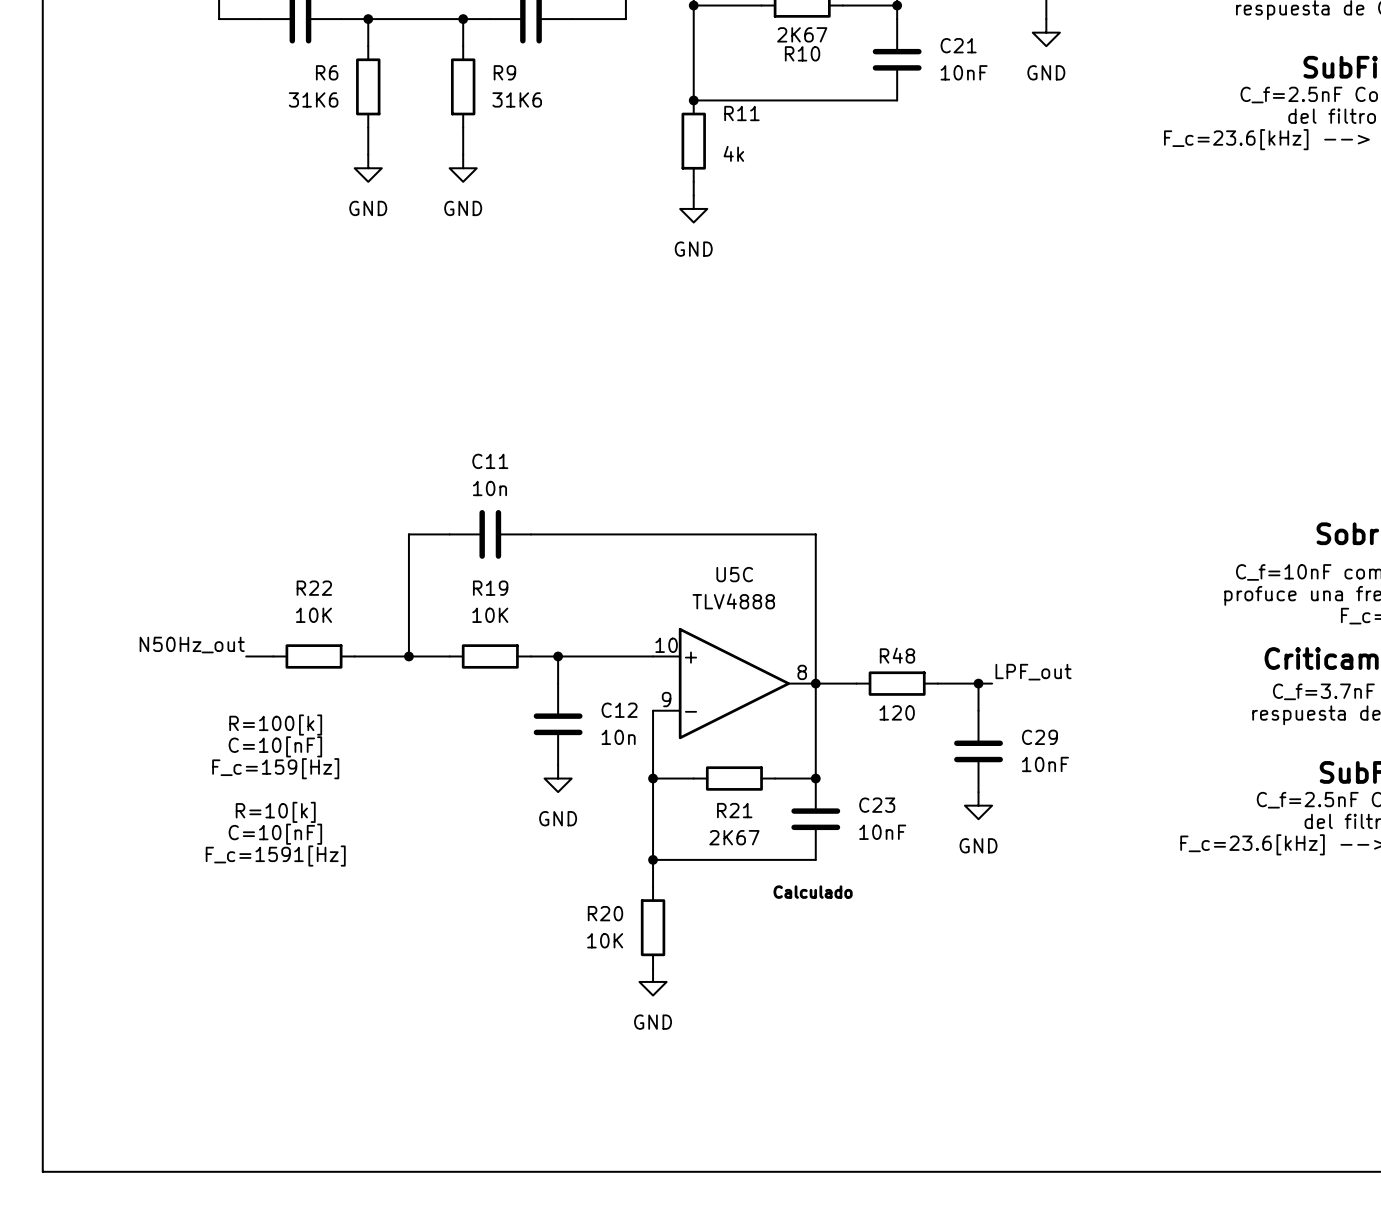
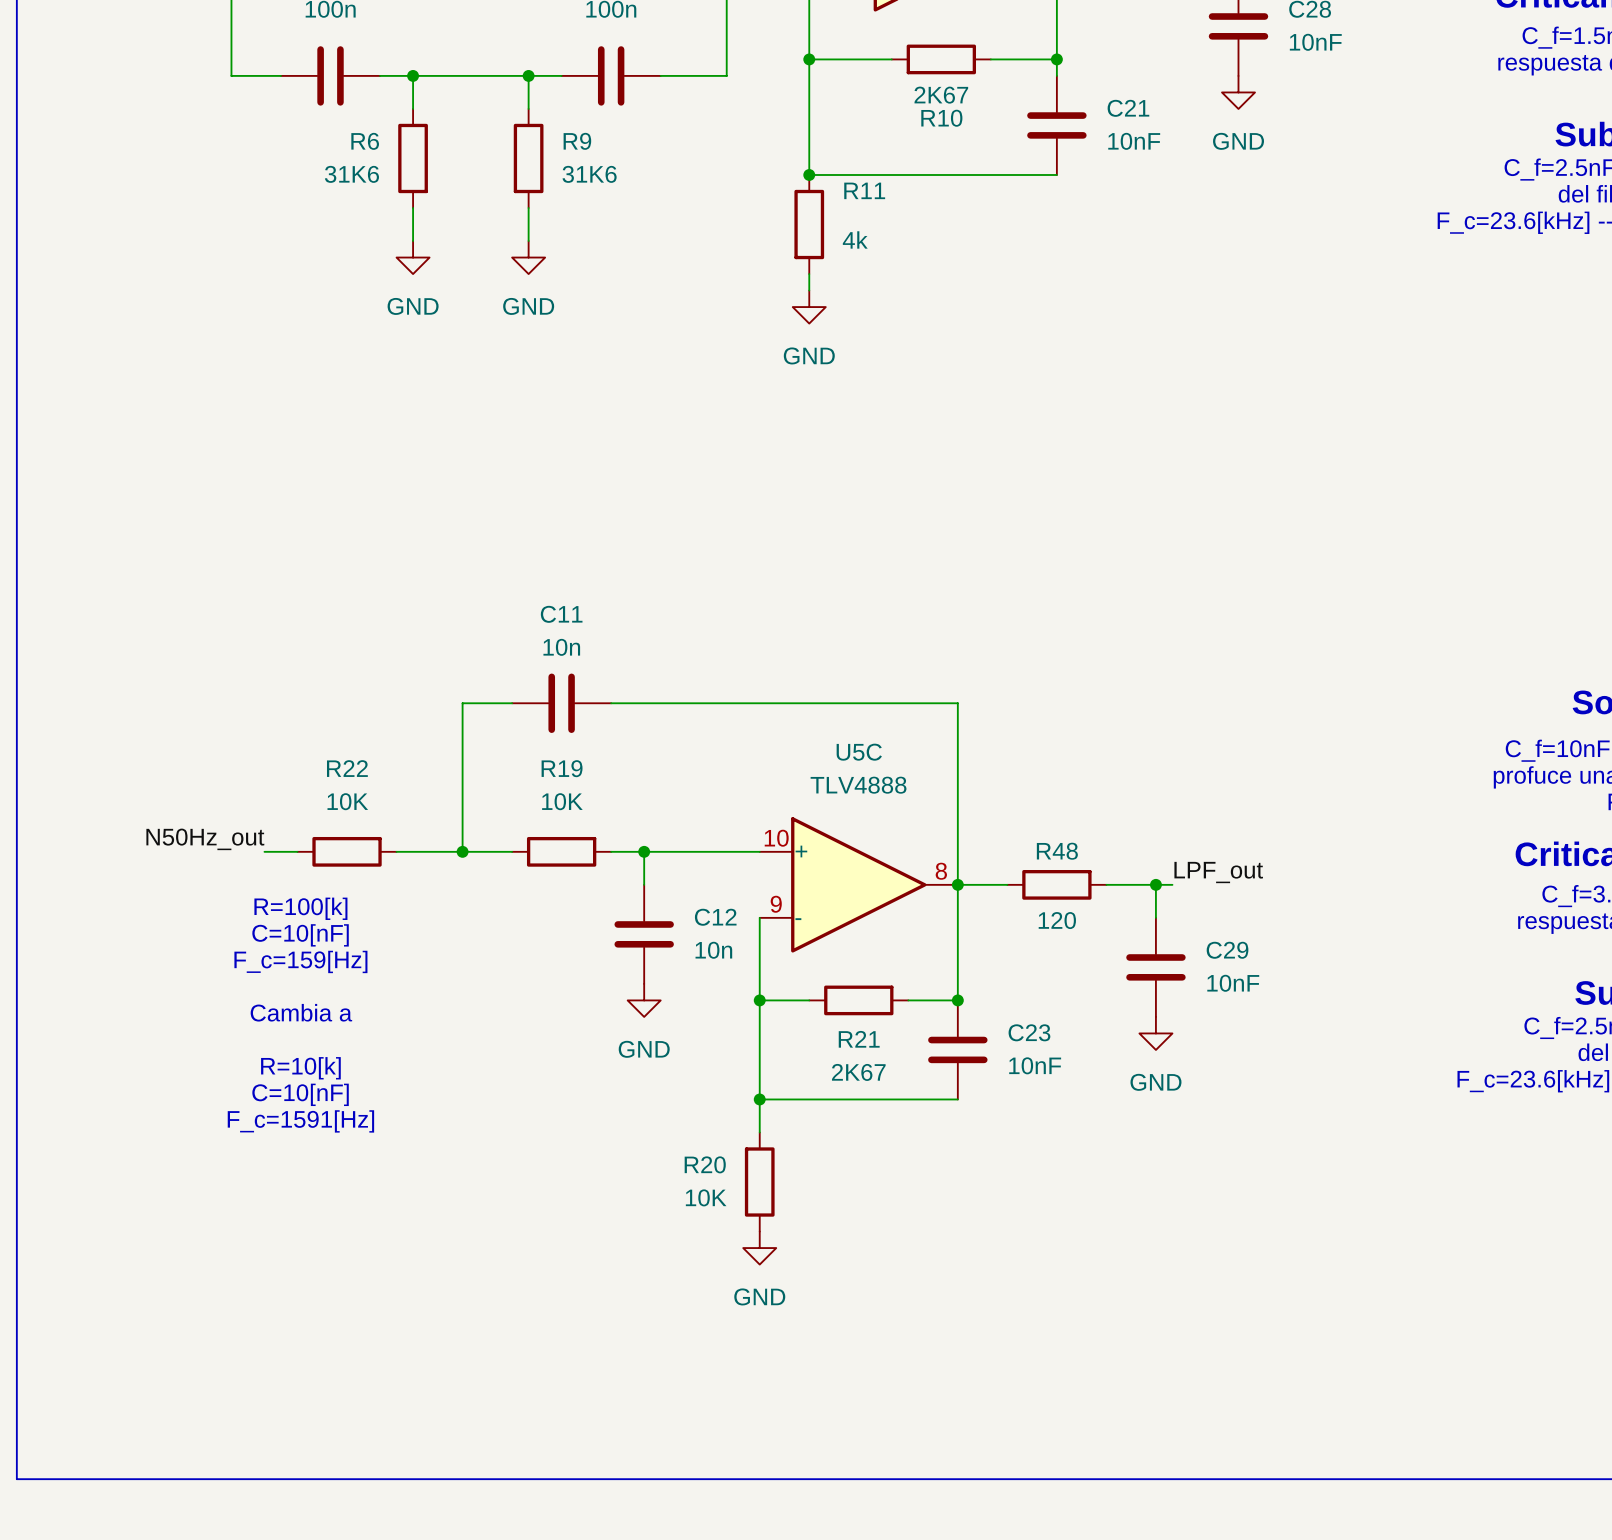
text: none -> R=100[k] (300, 908)
text: R=100[k] (275, 725) -> C=10[nF] (300, 935)
text: C=10[nF] (275, 746) -> F_c=159[Hz] (300, 961)
text: F_c=159[Hz] (275, 768) -> none
text: none -> Cambia a (301, 1012)
text: R=10[k] (275, 812) -> none
text: C=10[nF] (275, 834) -> R=10[k] (300, 1068)
text: F_c=1591[Hz] (275, 856) -> C=10[nF] (300, 1094)
text: none -> F_c=1591[Hz] (300, 1121)
text: Calculado (813, 892) -> none

